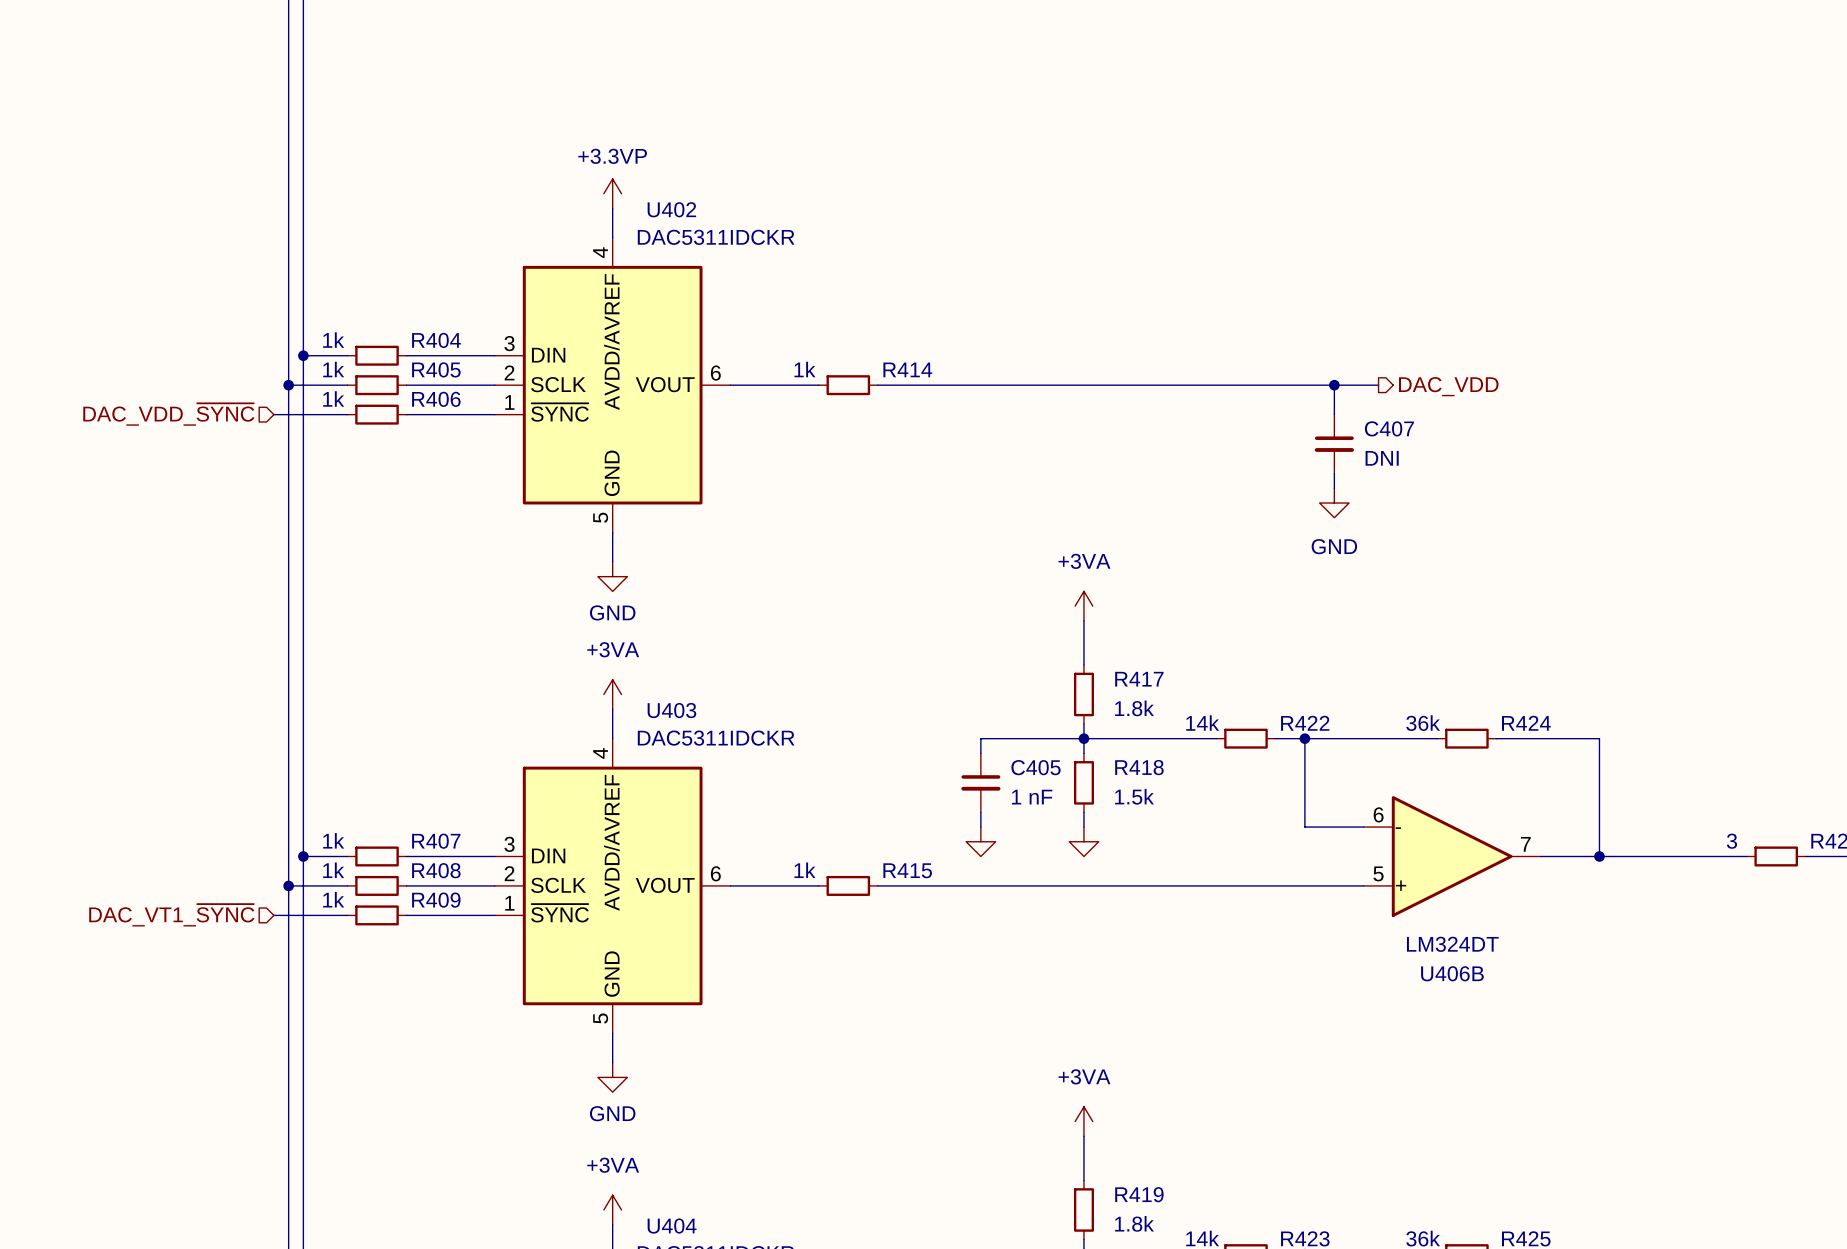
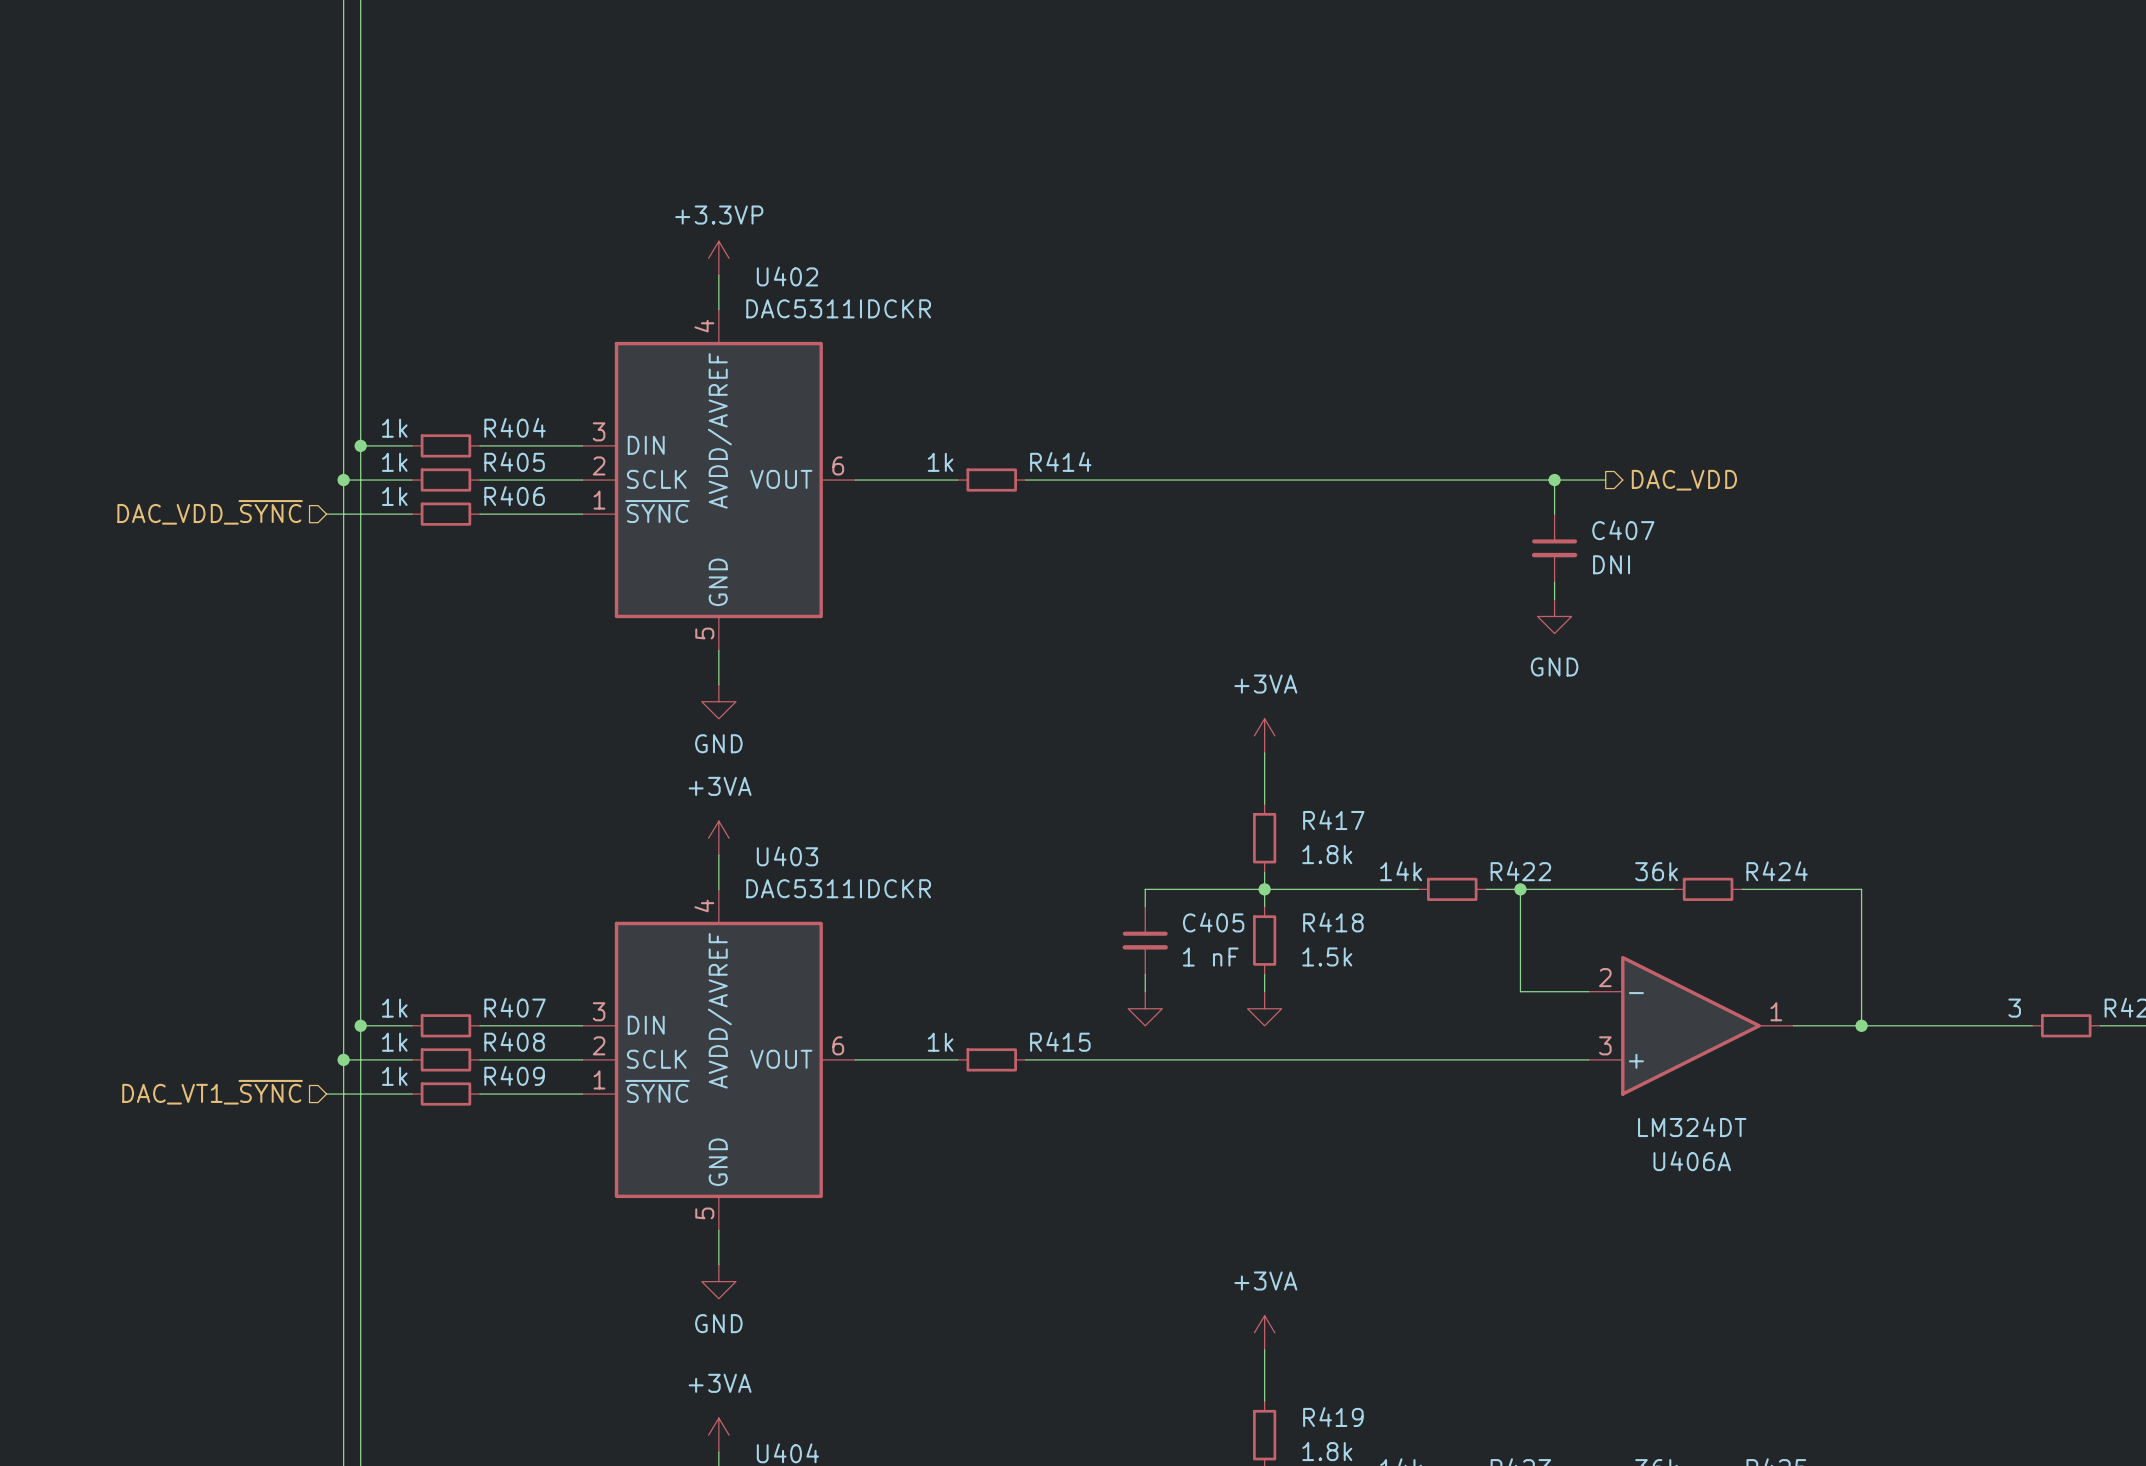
U406B pin number: 6 (1378, 814) -> 2 (1605, 977)
U406B pin number: 7 (1525, 844) -> 1 (1776, 1011)
U406B pin number: 5 (1378, 873) -> 3 (1605, 1045)
U406B name: U406B (1452, 973) -> U406A (1692, 1161)

